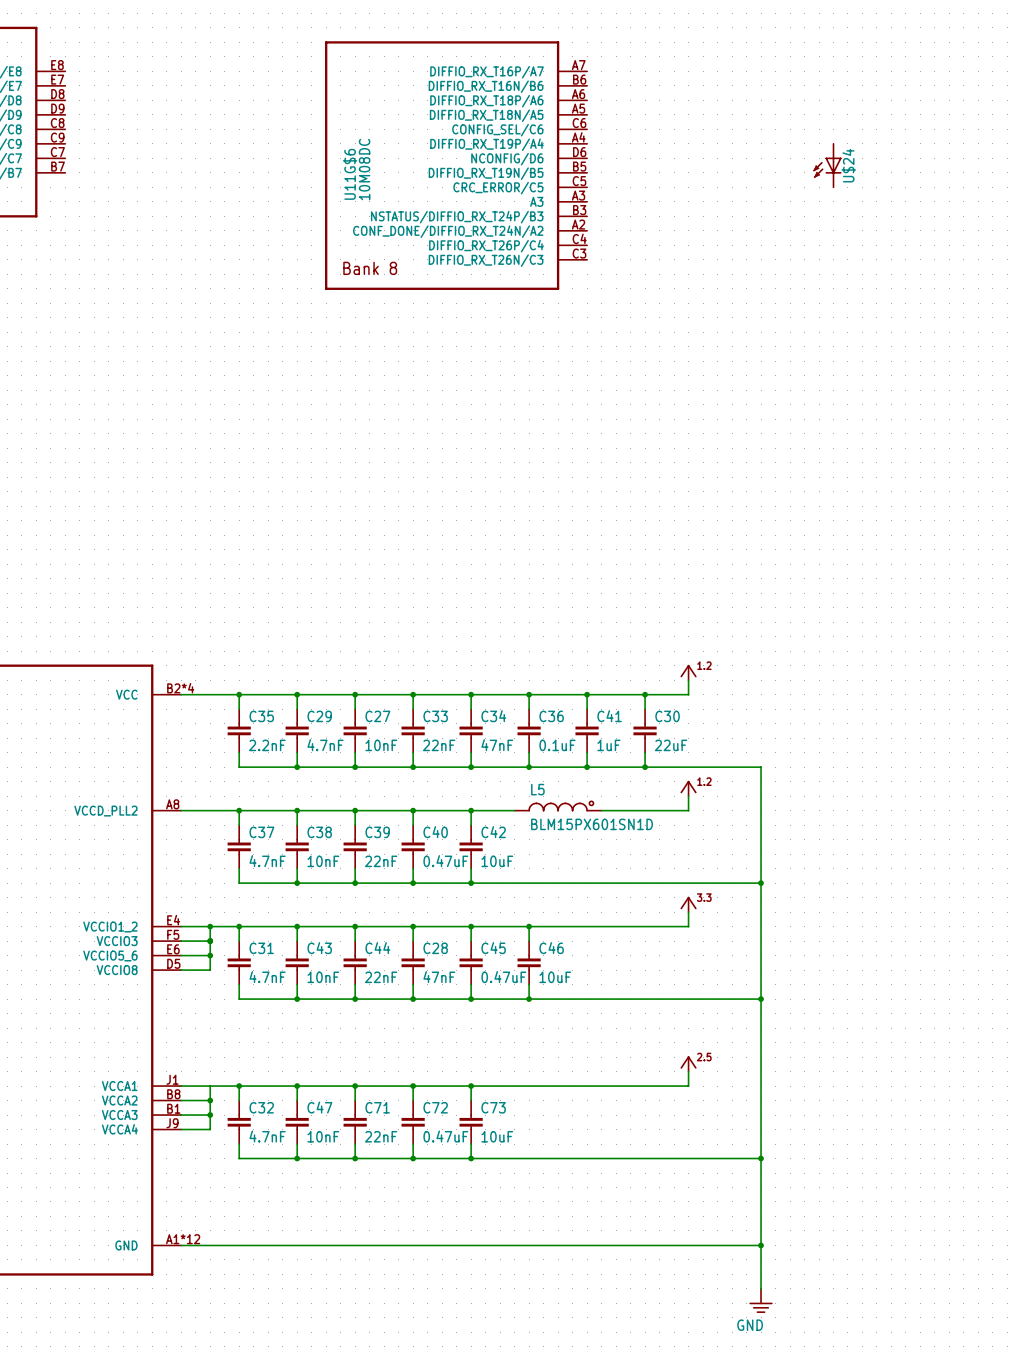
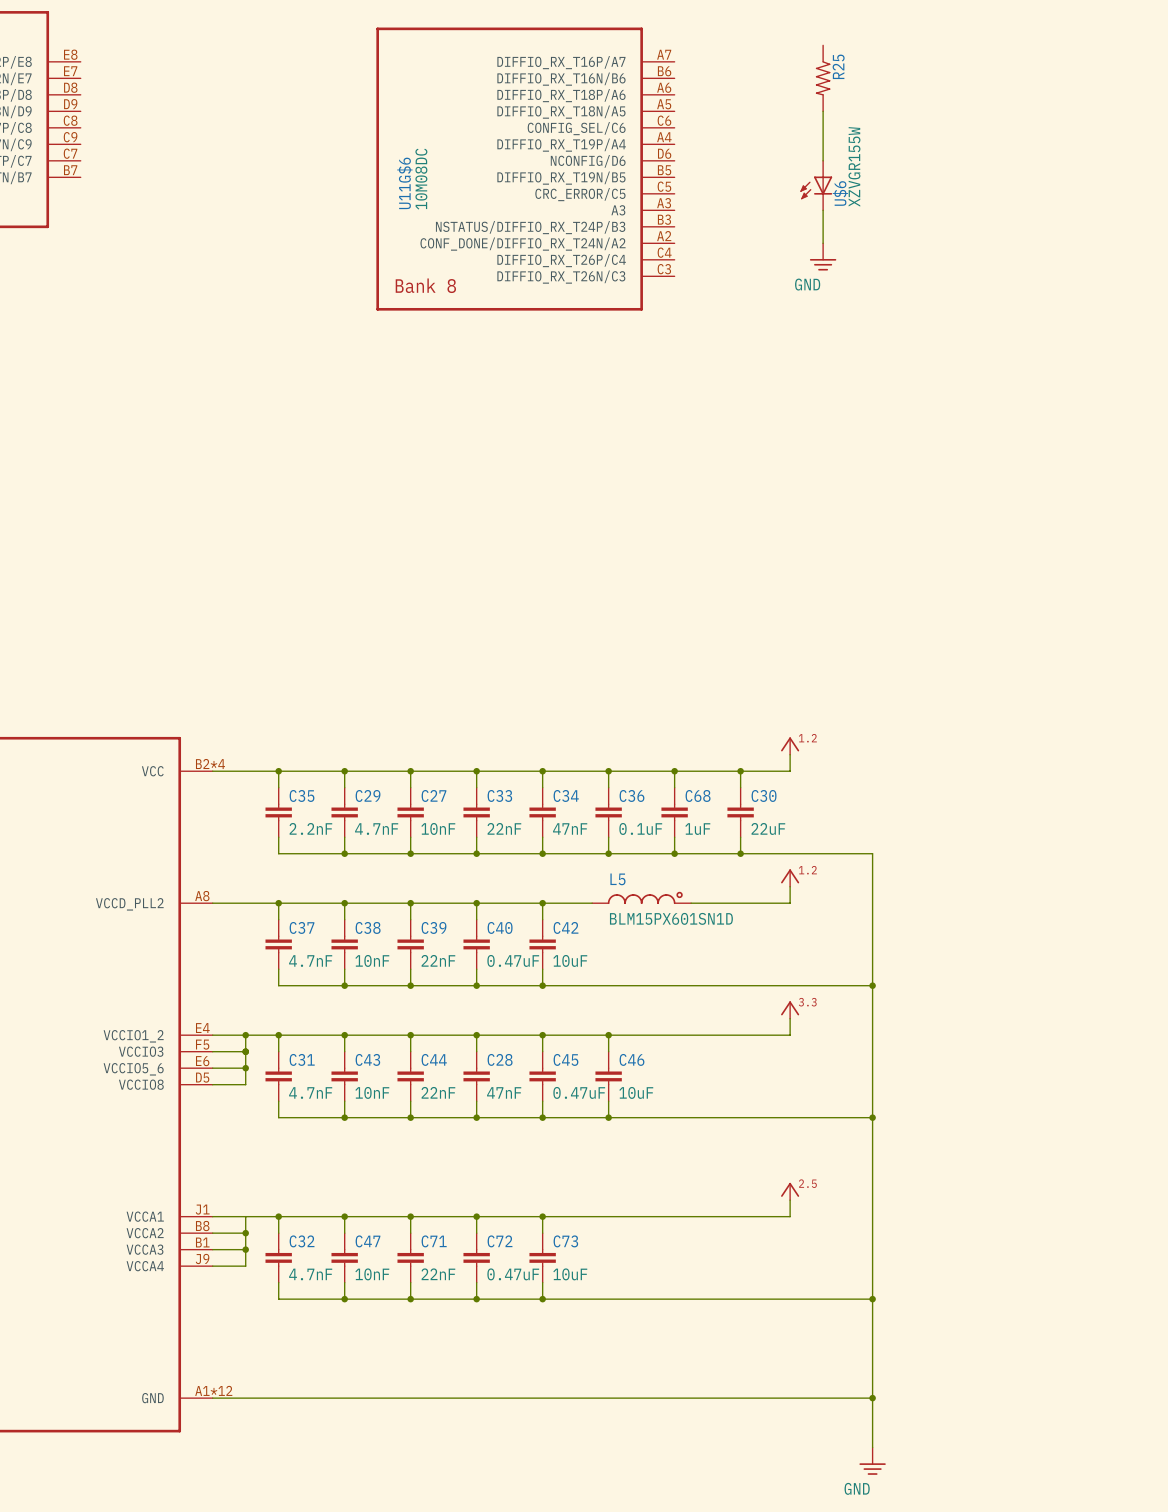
R25: none -> (823, 78)
wire: none -> (823, 111) (823, 160)
U$24: (827, 165) -> none
U$6: none -> XZVGR155W (816, 185)
wire: none -> (823, 210) (823, 243)
power symbol: none -> GND (823, 256)
C41 name: C41 (609, 716) -> C68 (698, 795)

